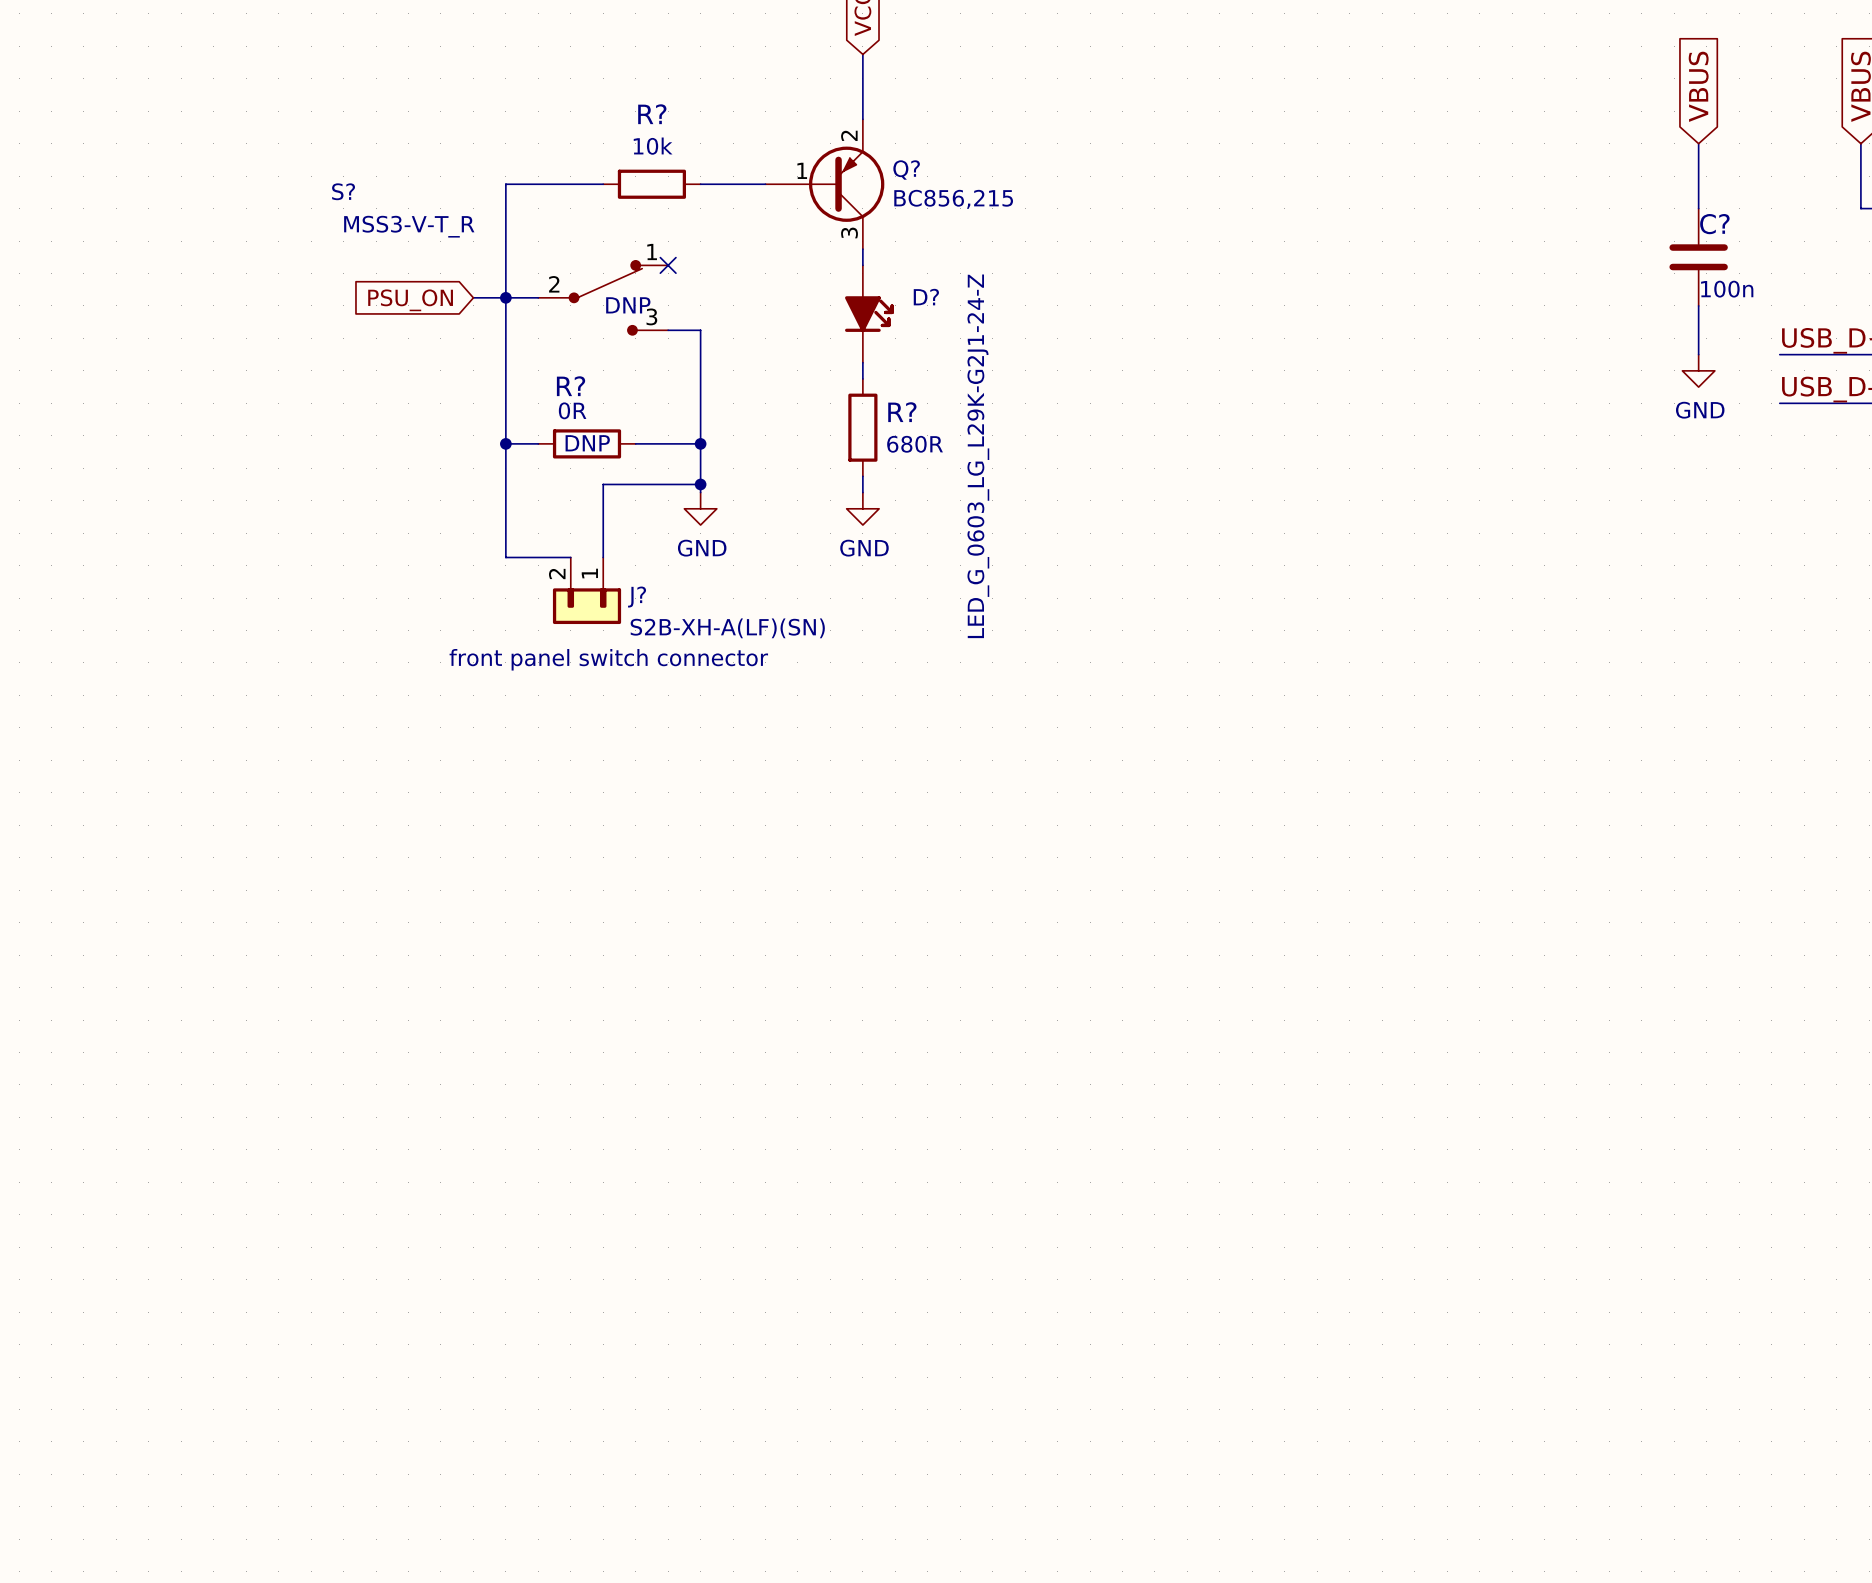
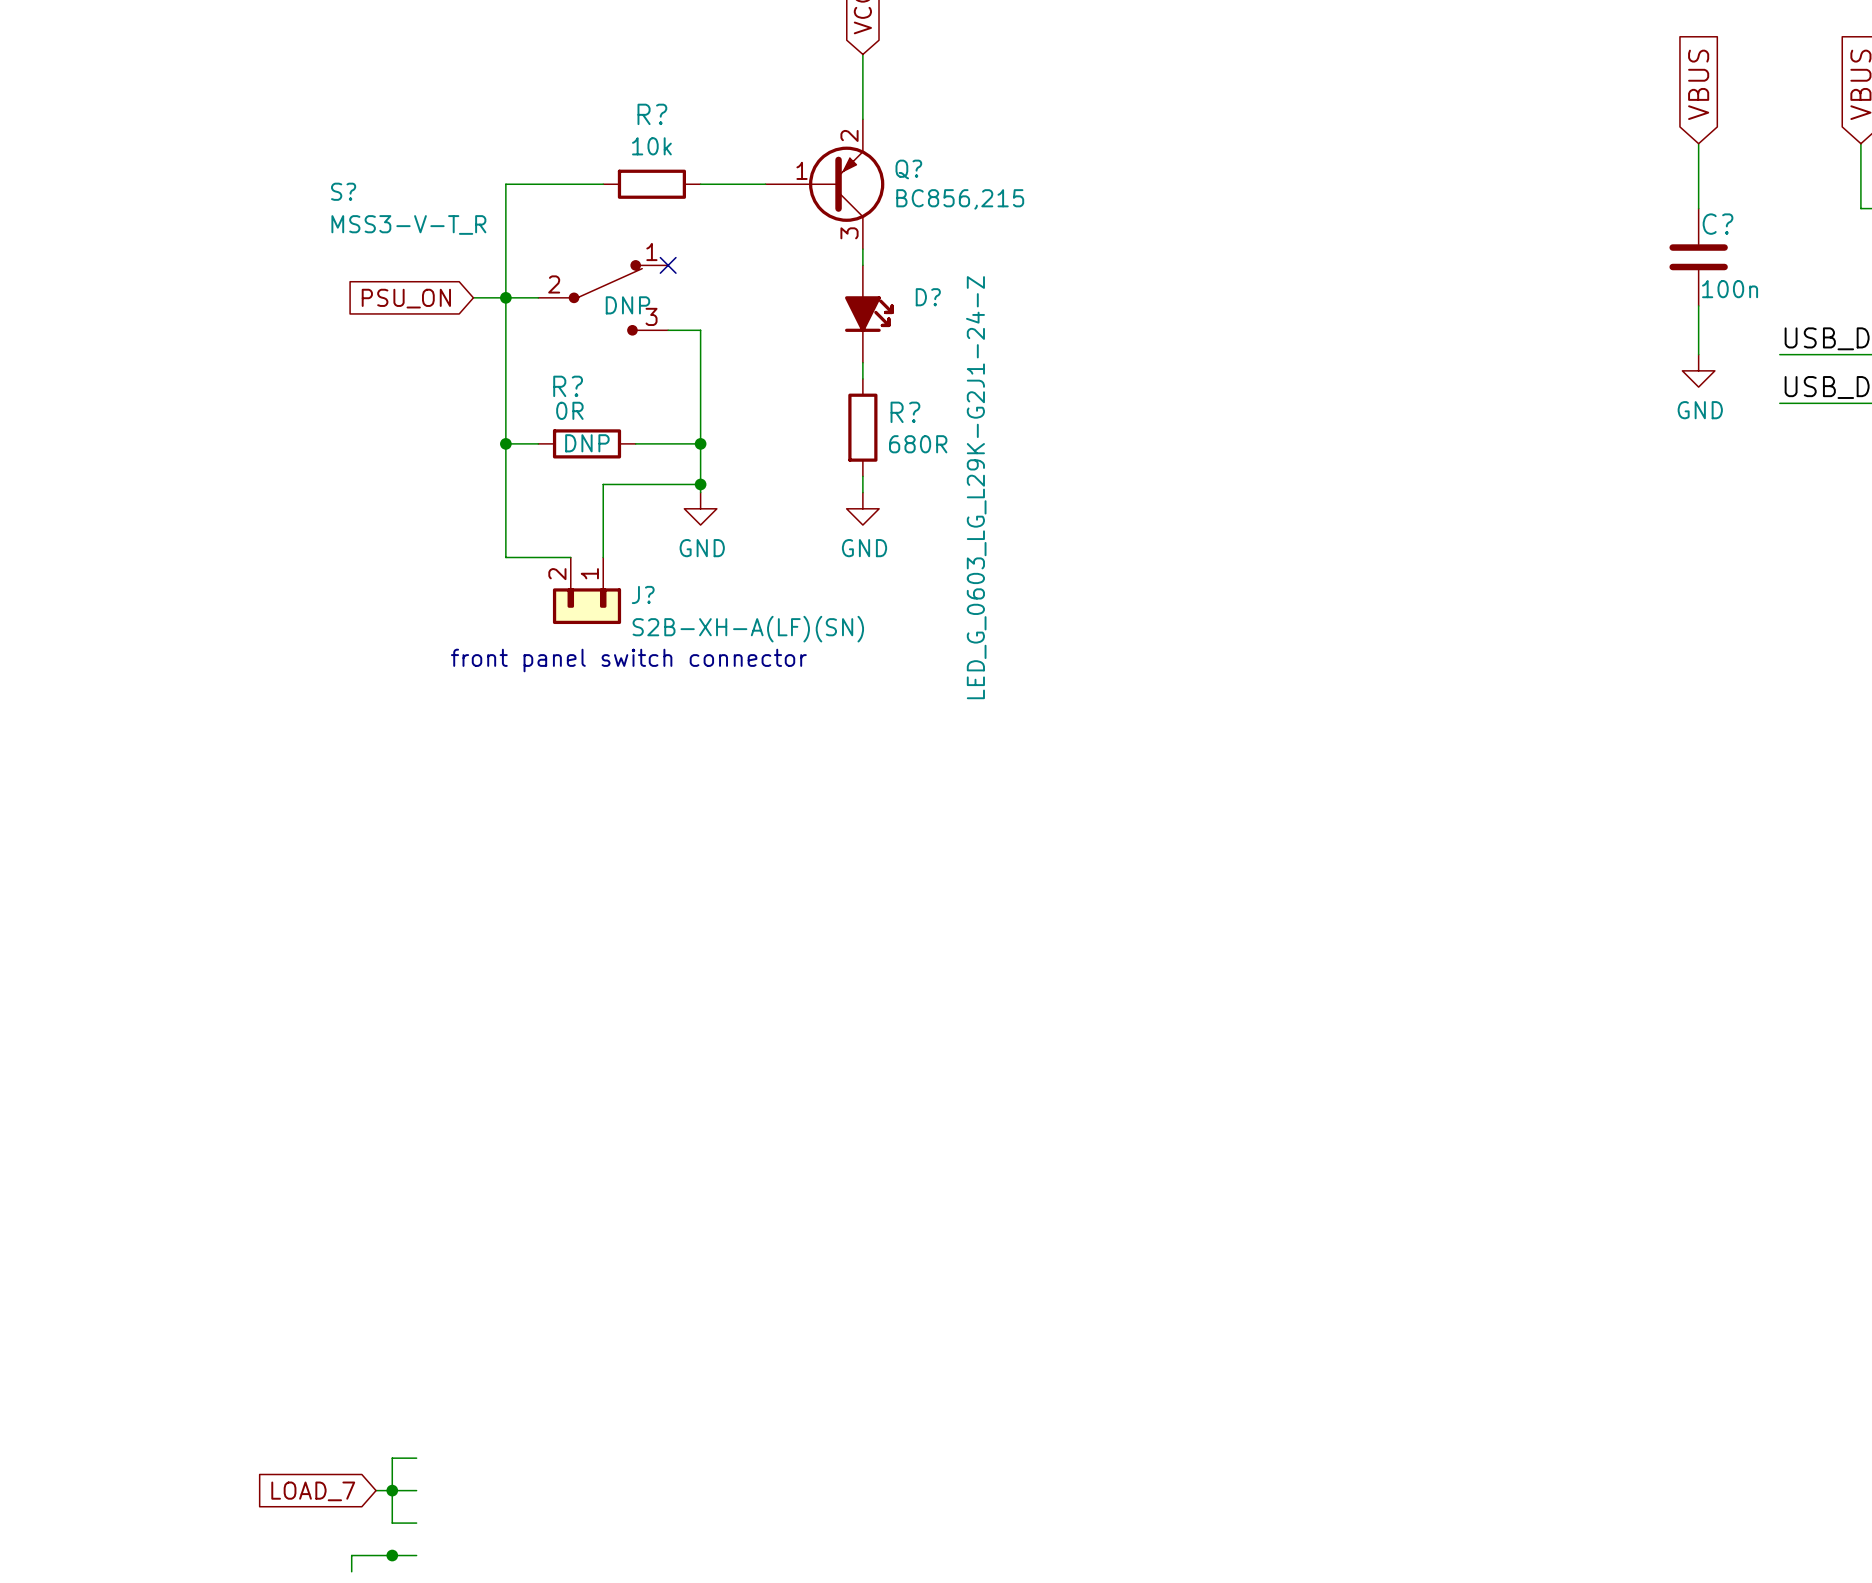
wire: none -> (416, 1458) (392, 1458) (392, 1523) (416, 1523)
wire: none -> (376, 1490) (416, 1490)
junction: none -> (392, 1490)
global label: none -> LOAD_7 (313, 1491)
junction: none -> (392, 1555)
wire: none -> (416, 1555) (351, 1555) (351, 1571)

